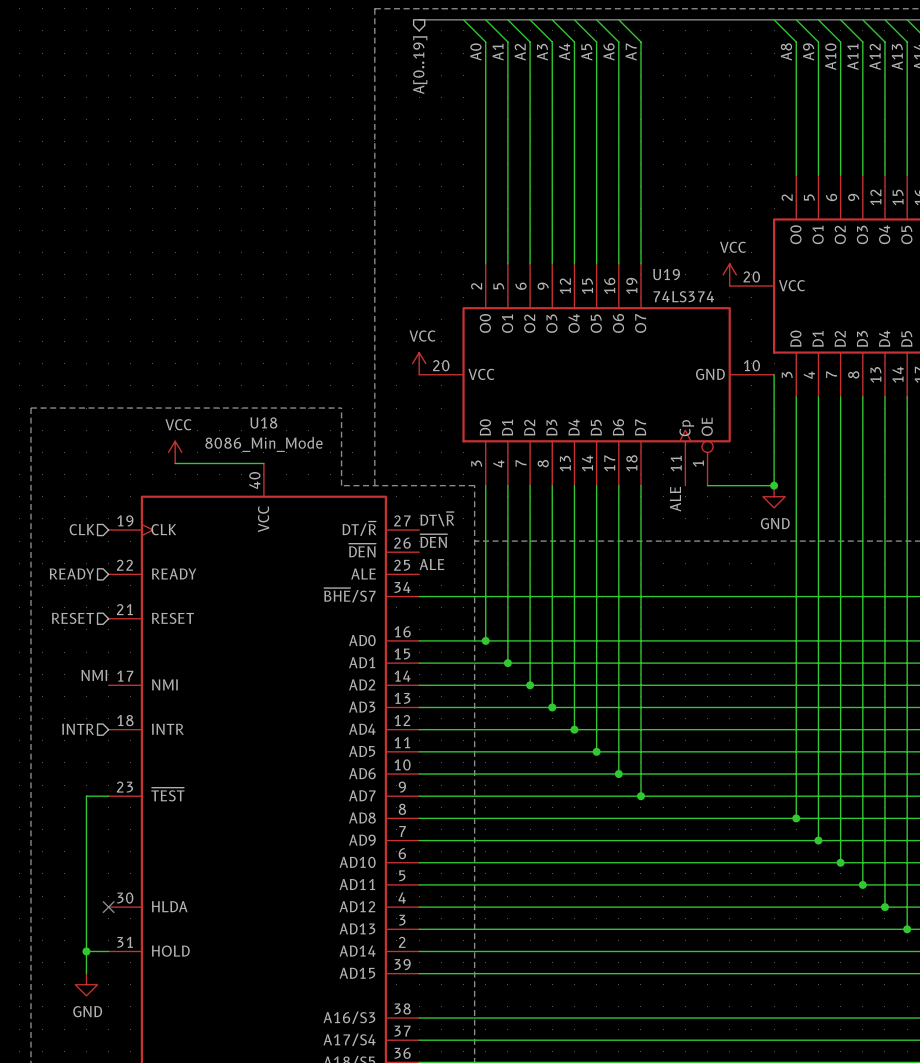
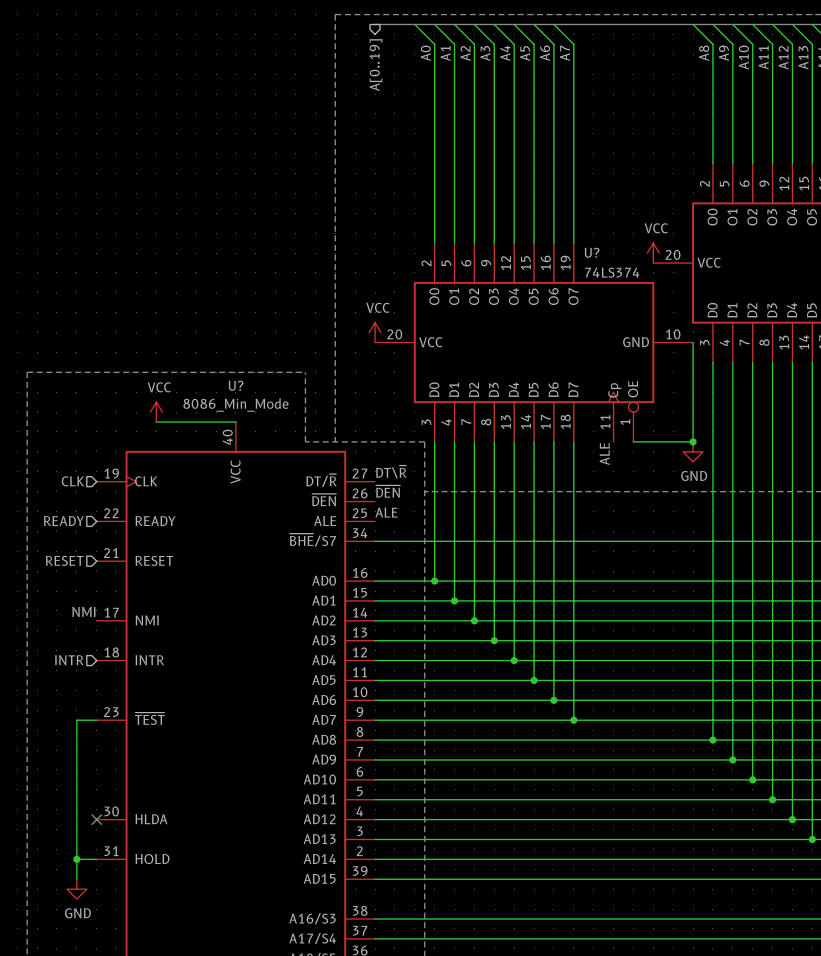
U19 name: U19 (666, 274) -> U? (592, 252)
U18 name: U18 (263, 422) -> U? (236, 385)

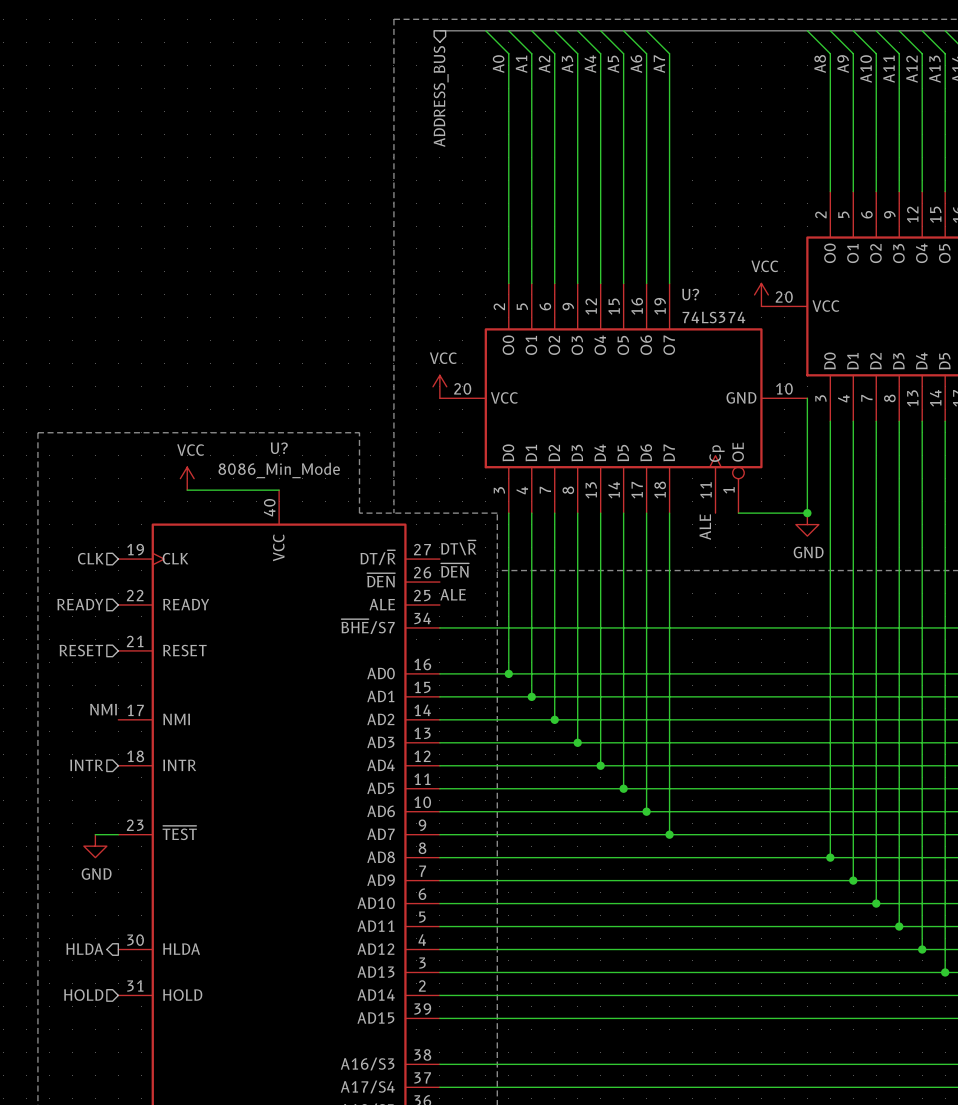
hierarchical label: A[0..19] (376, 65) -> ADDRESS_BUS (441, 96)
wire: (76, 720) (76, 879) -> none
hierarchical label: none -> HLDA (84, 949)
no-connect mark: (96, 819) -> none
hierarchical label: none -> HOLD (83, 995)
wire: (76, 859) (96, 859) -> none
junction: (76, 859) -> none
power symbol position: GND (76, 889) -> GND (95, 846)

